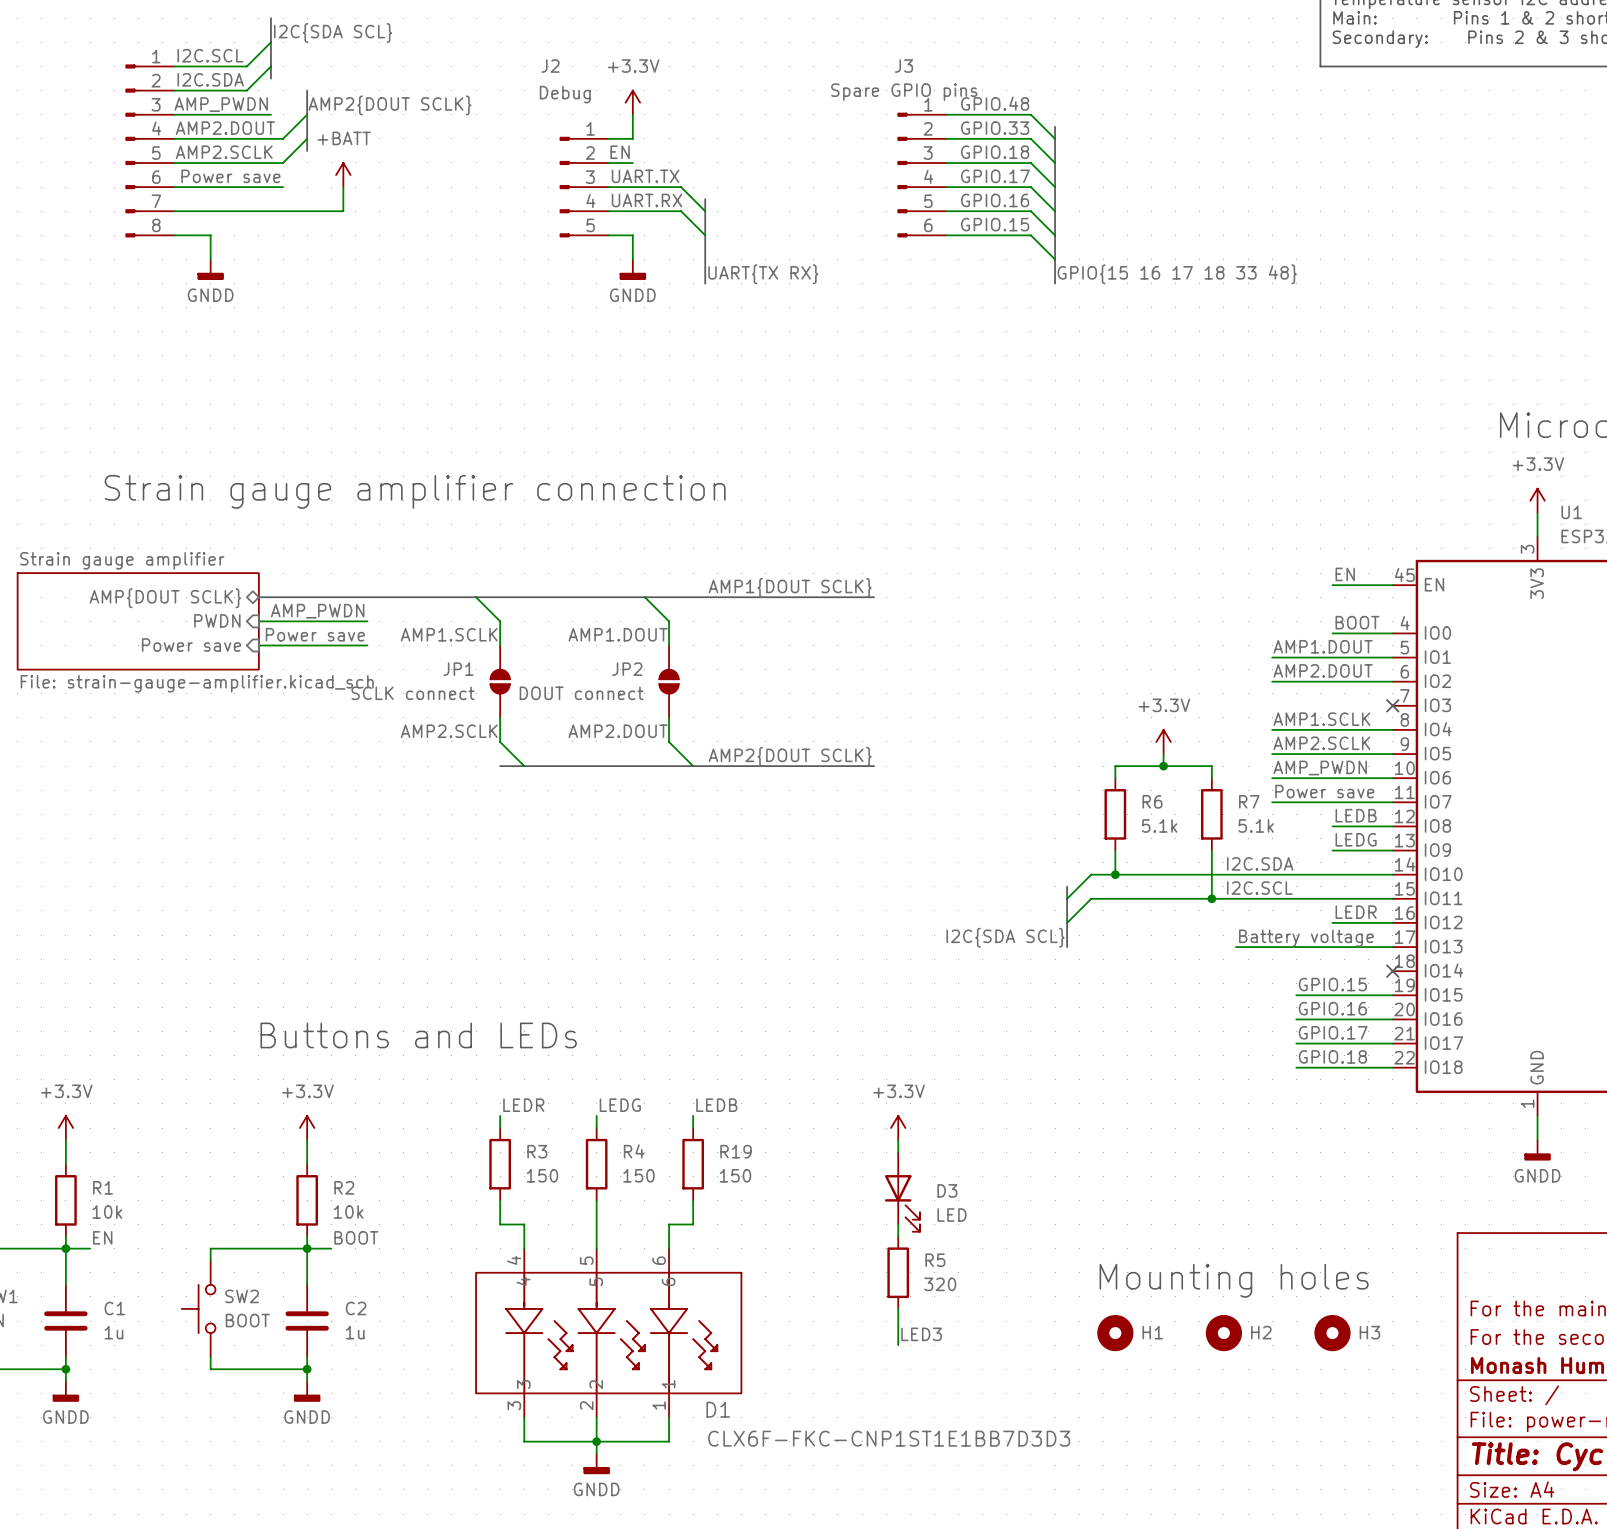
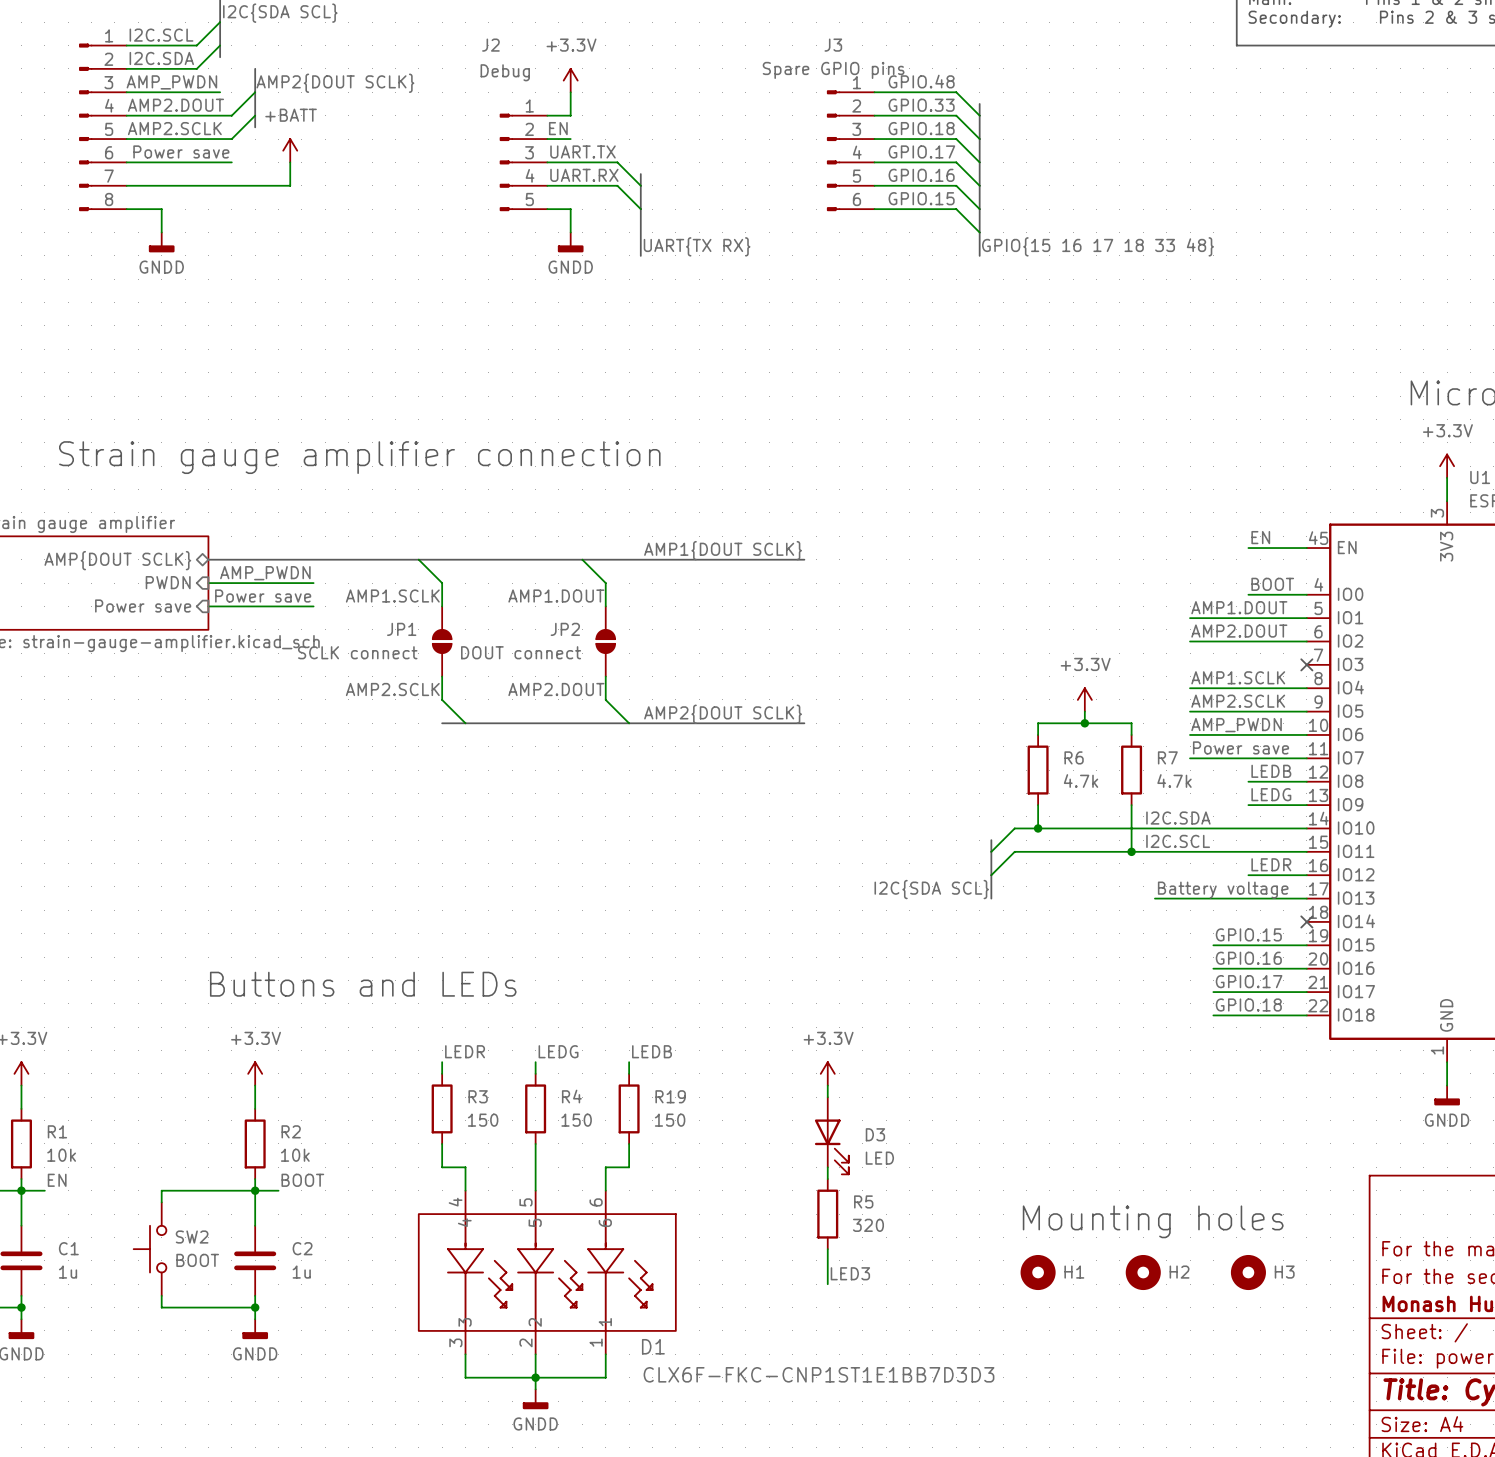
R6 value: 5.1k (1159, 825) -> 4.7k (1081, 781)
R7 value: 5.1k (1256, 825) -> 4.7k (1174, 781)

